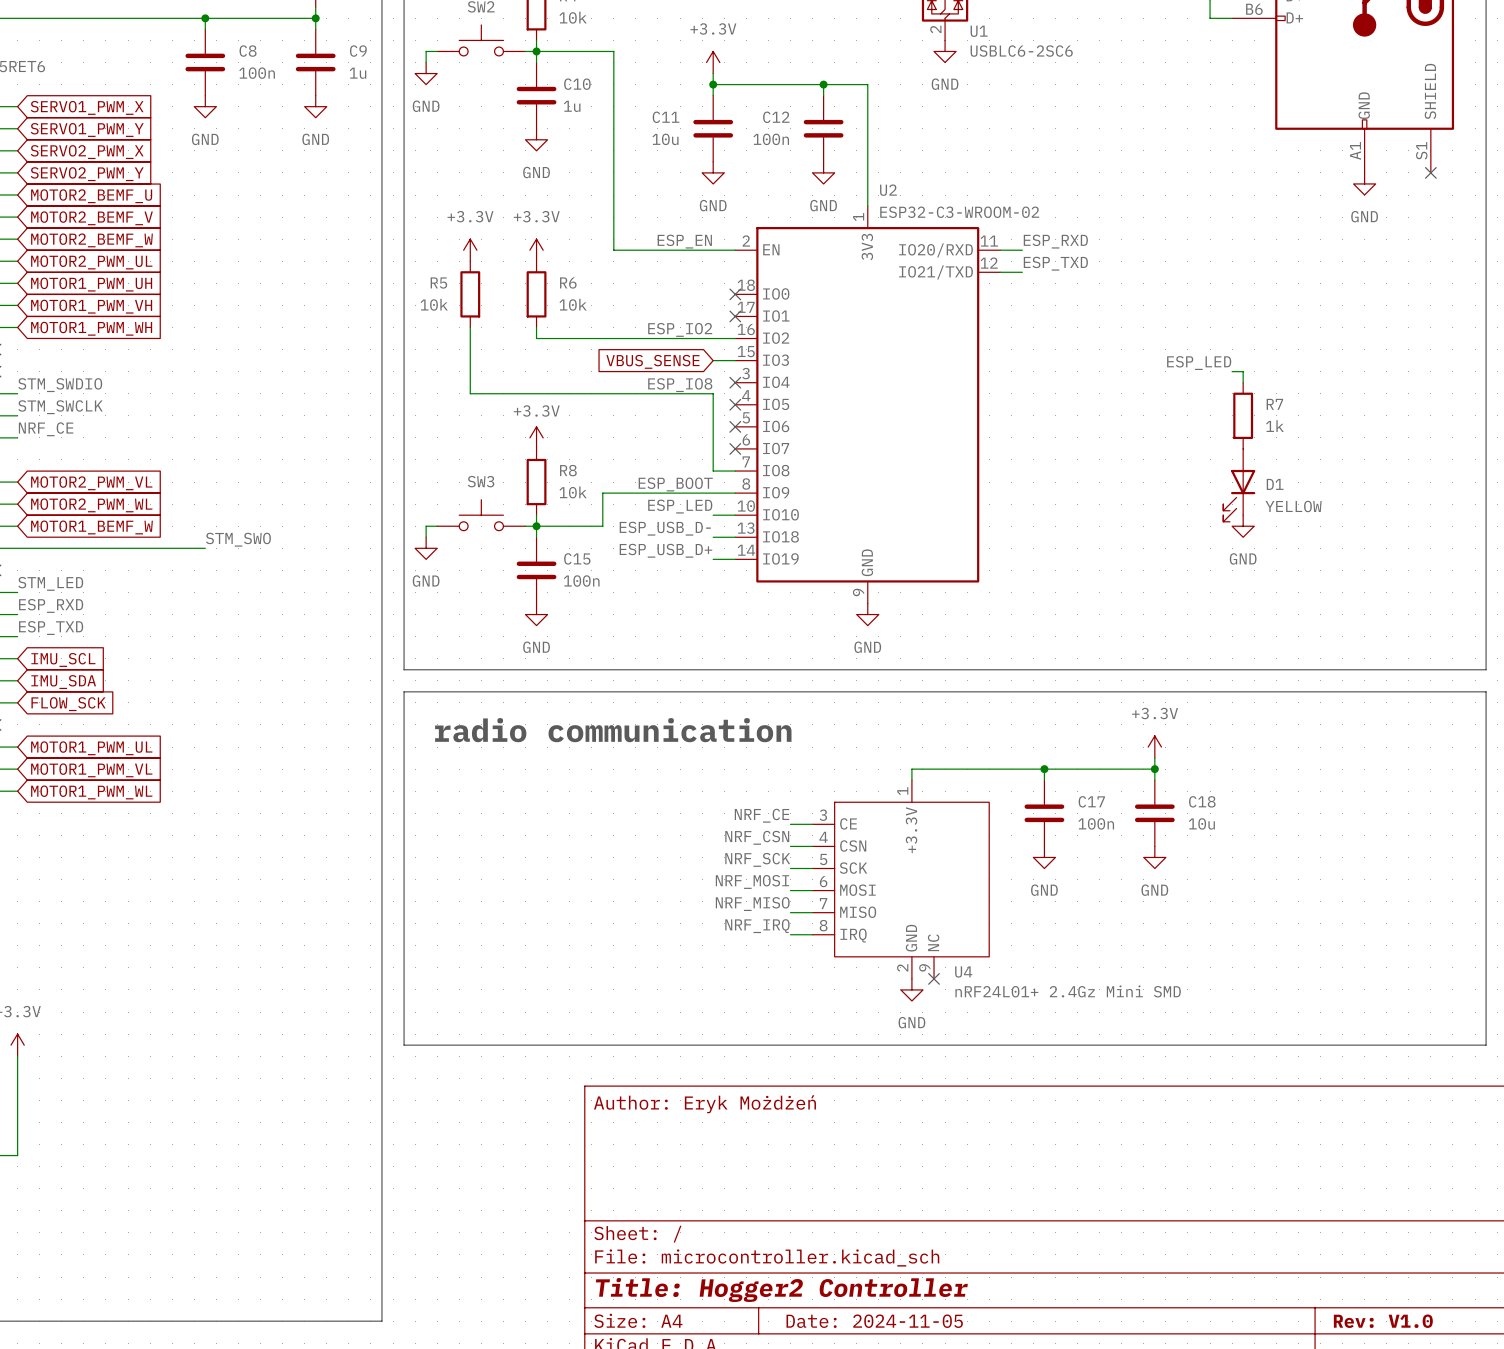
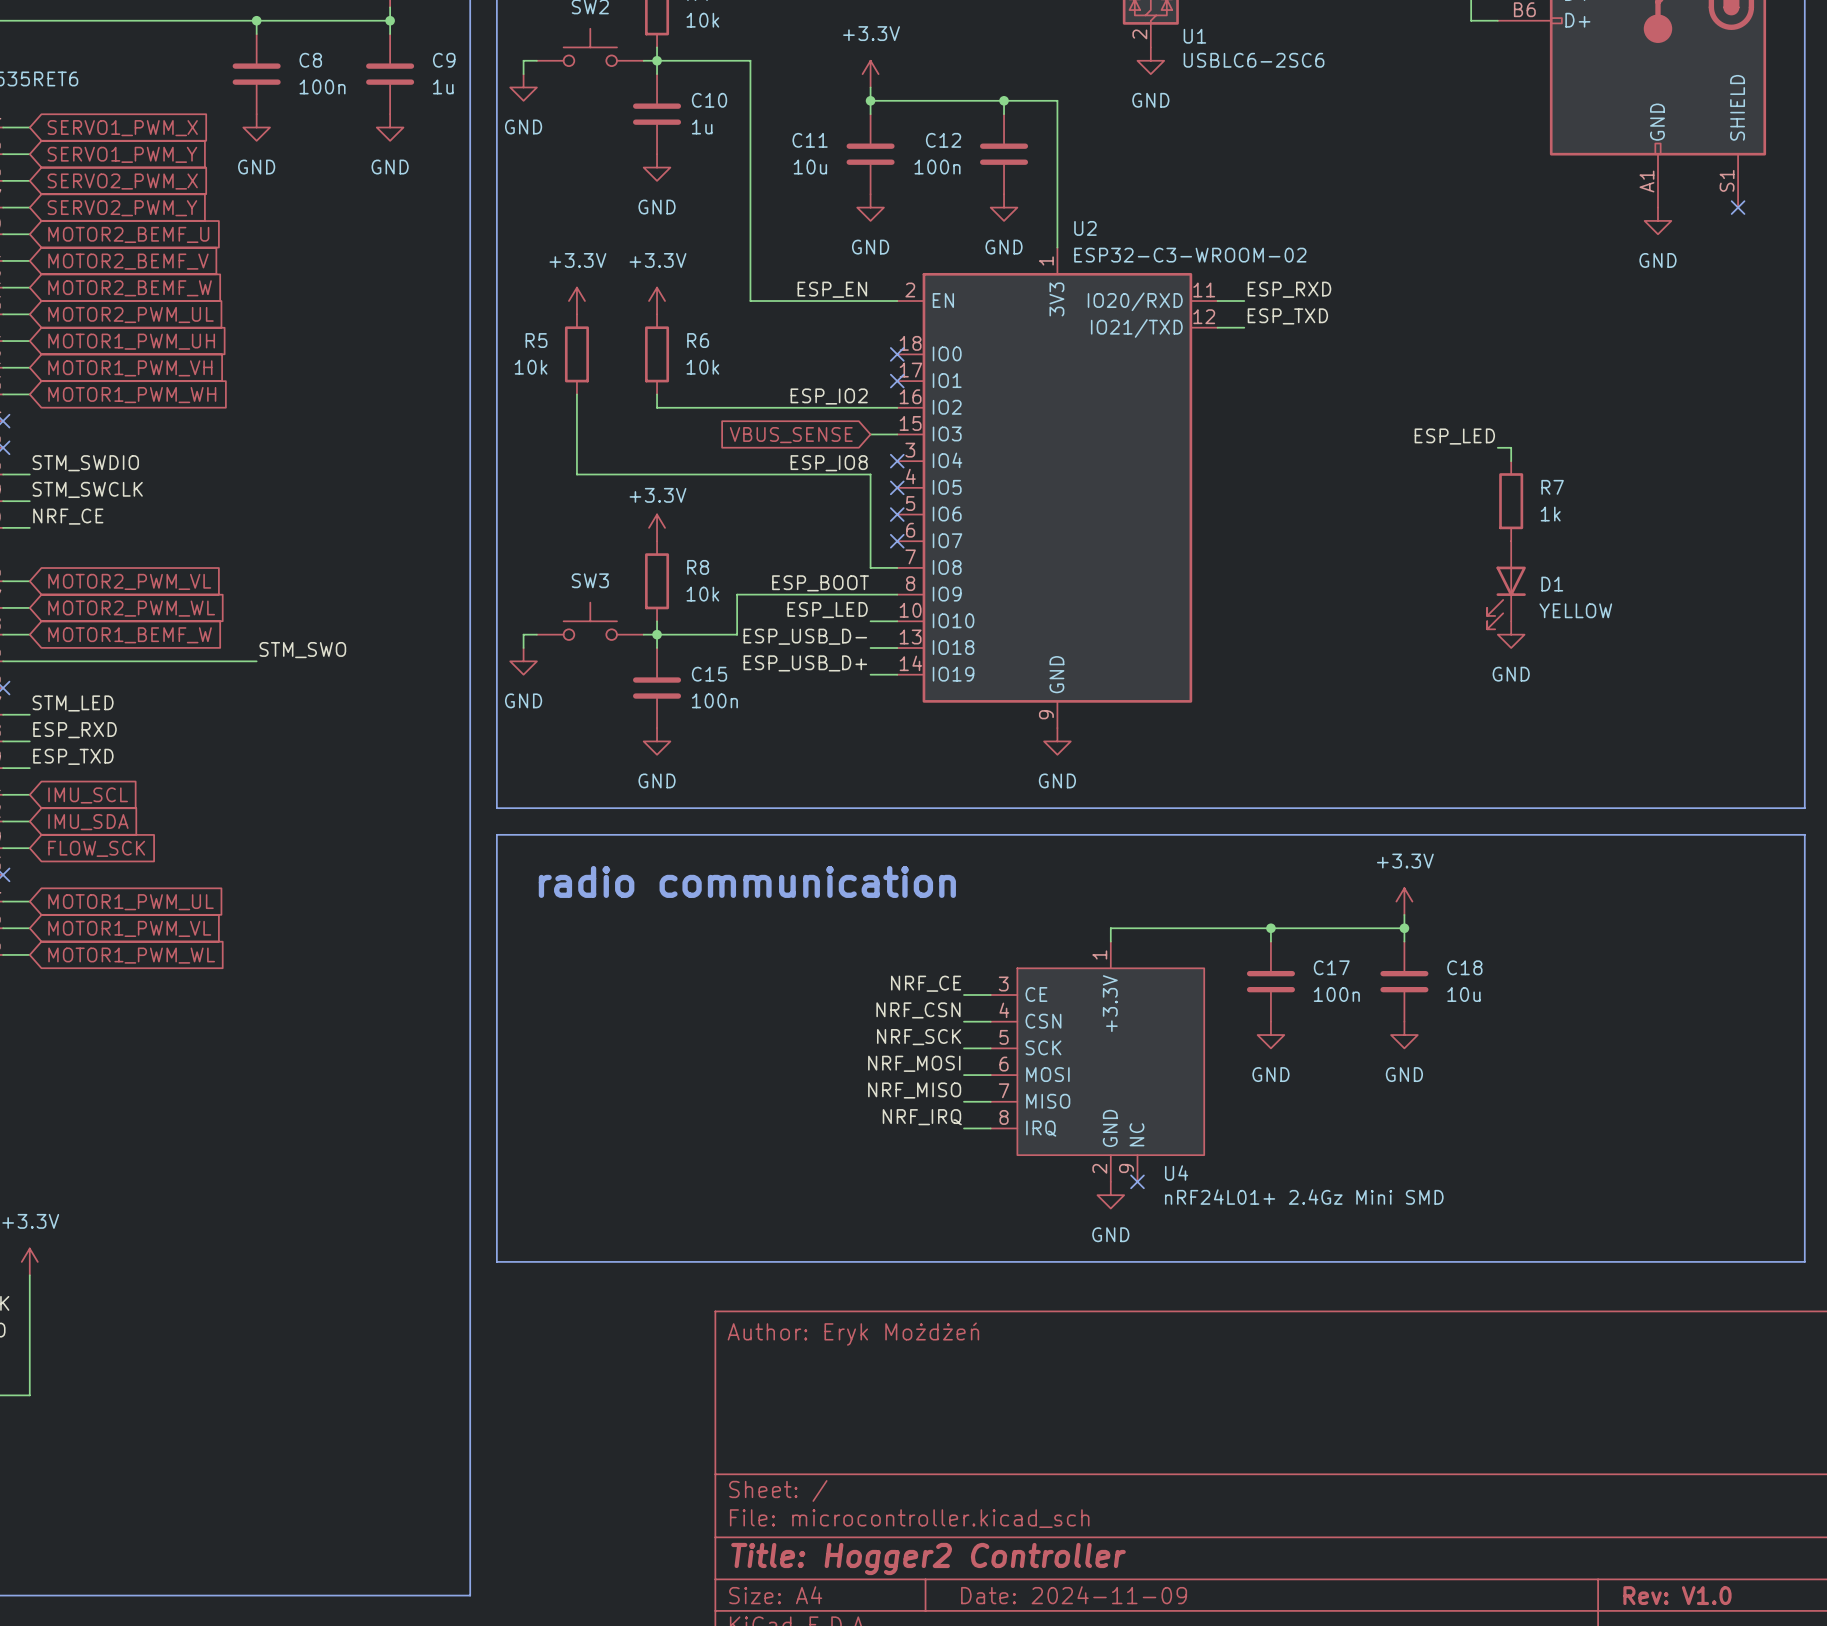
title block: Date: 2024-11-05 (874, 1321) -> Date: 2024-11-09 (1074, 1595)

